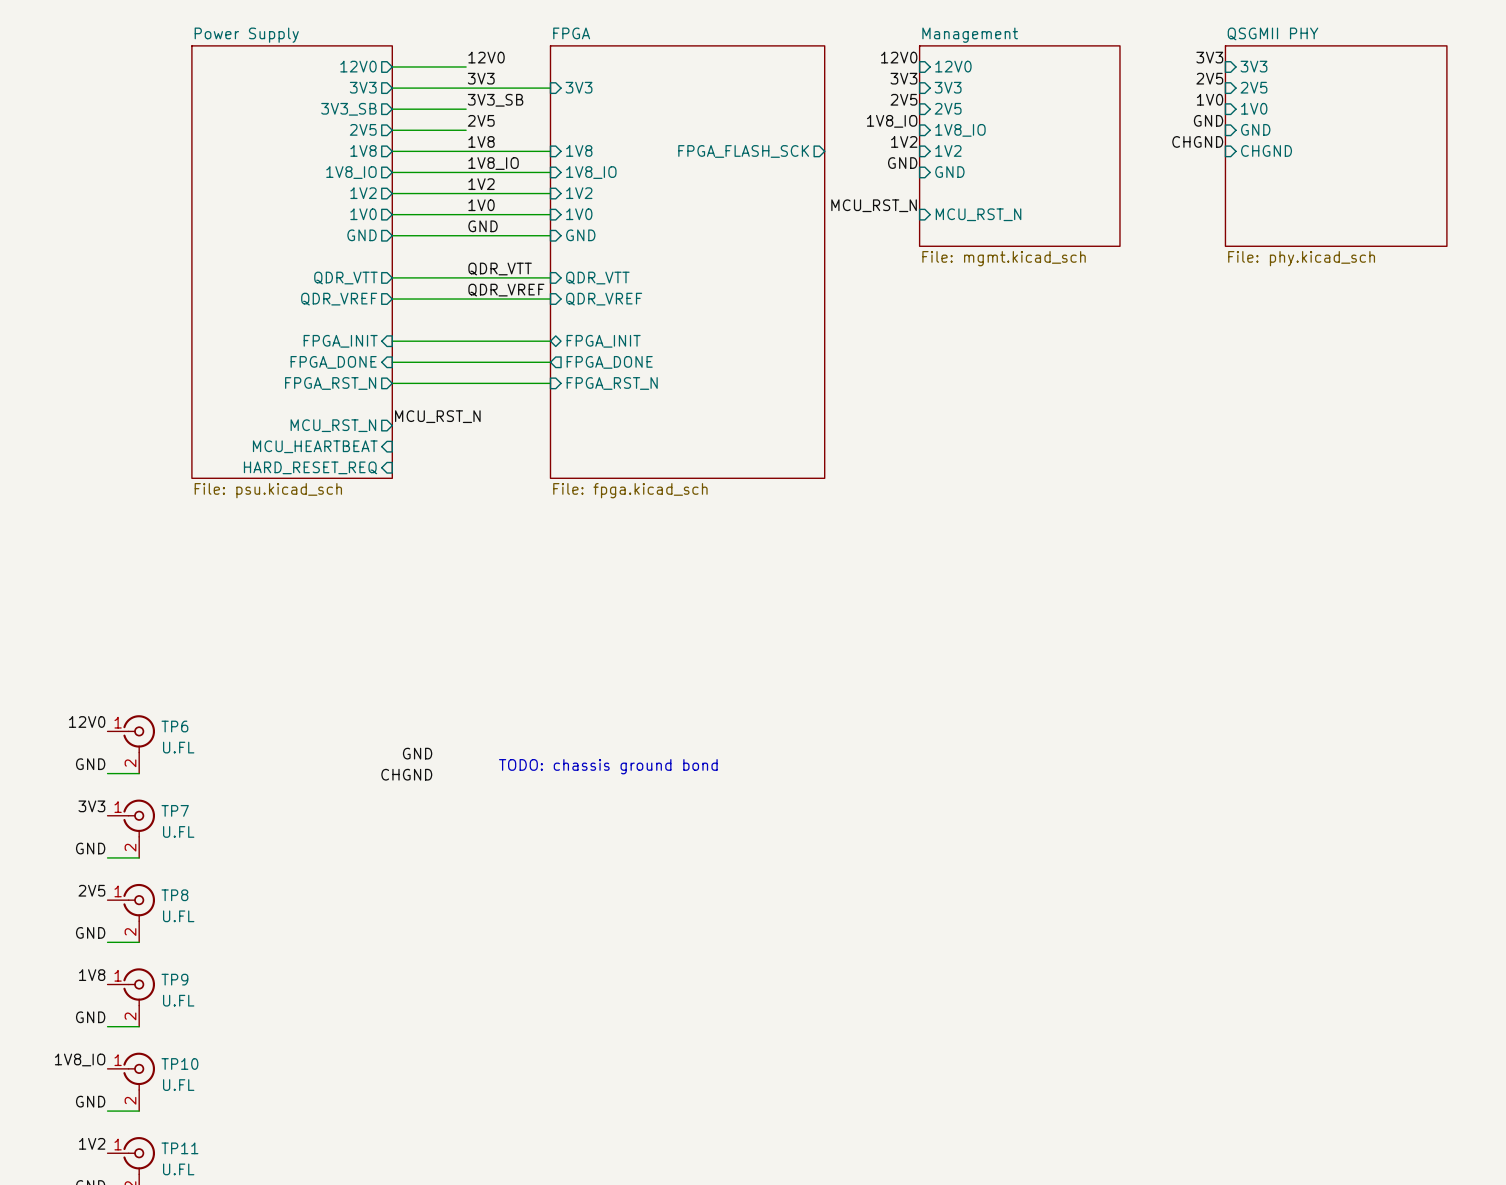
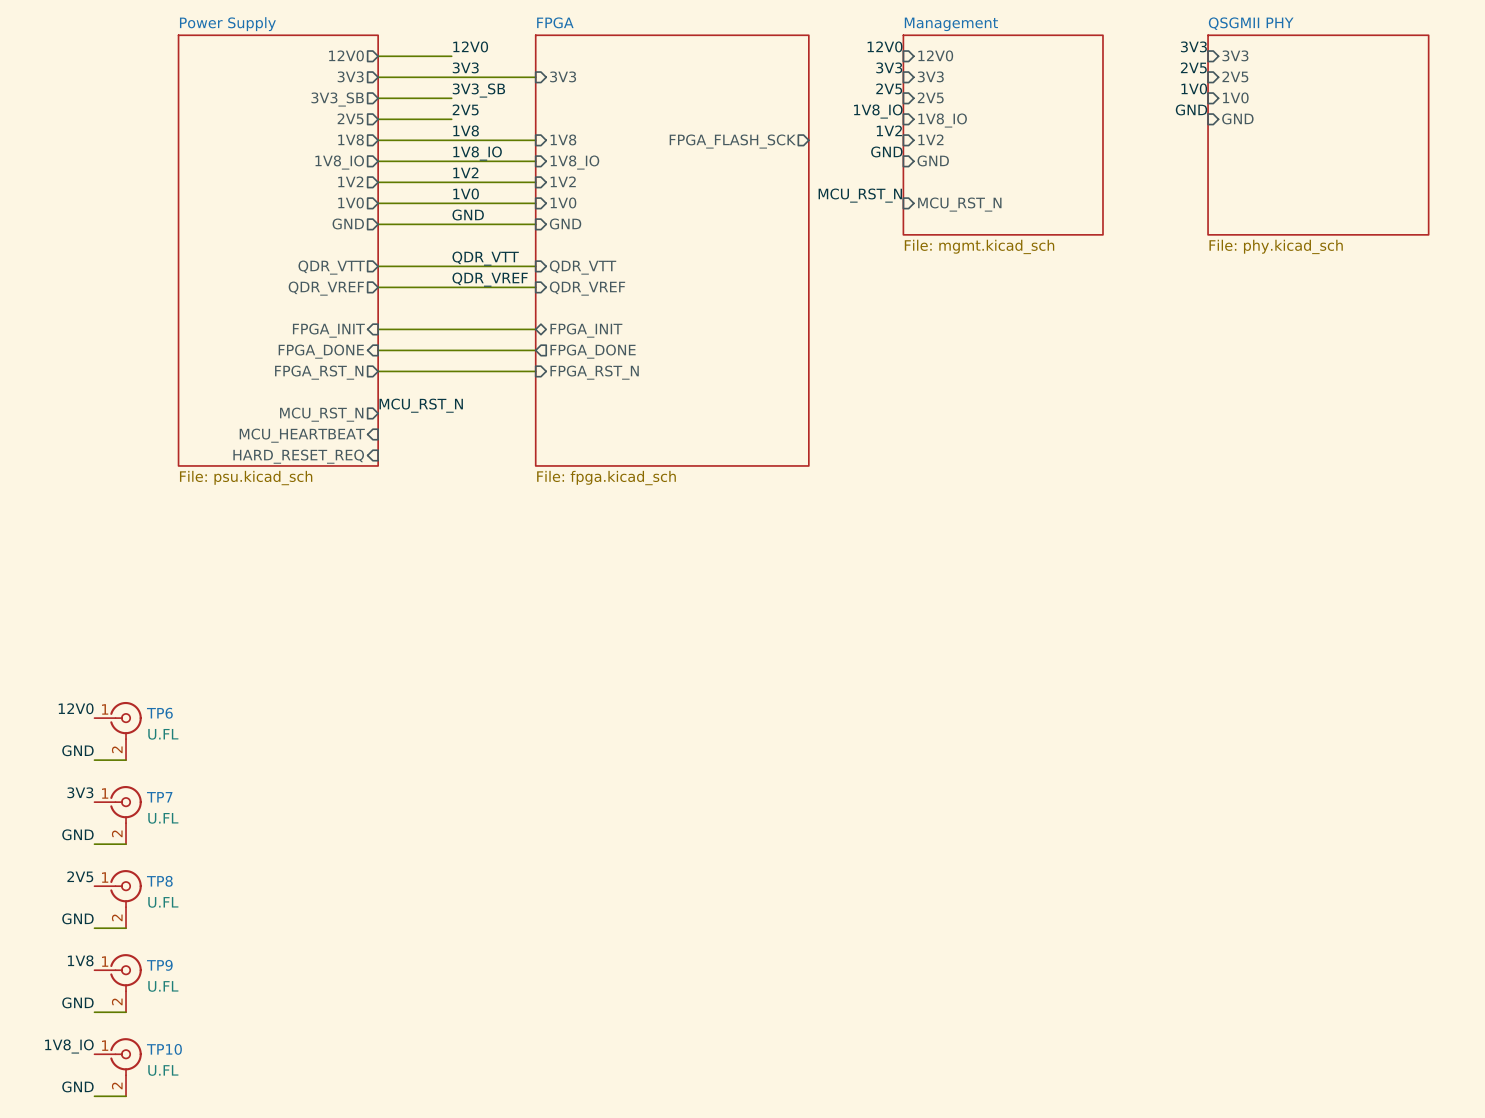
label: CHGND (1197, 141) -> none
sheet pin: CHGND (1266, 150) -> none
label: GND (417, 753) -> none
text: TODO: chassis ground bond (608, 766) -> none
label: CHGND (406, 774) -> none

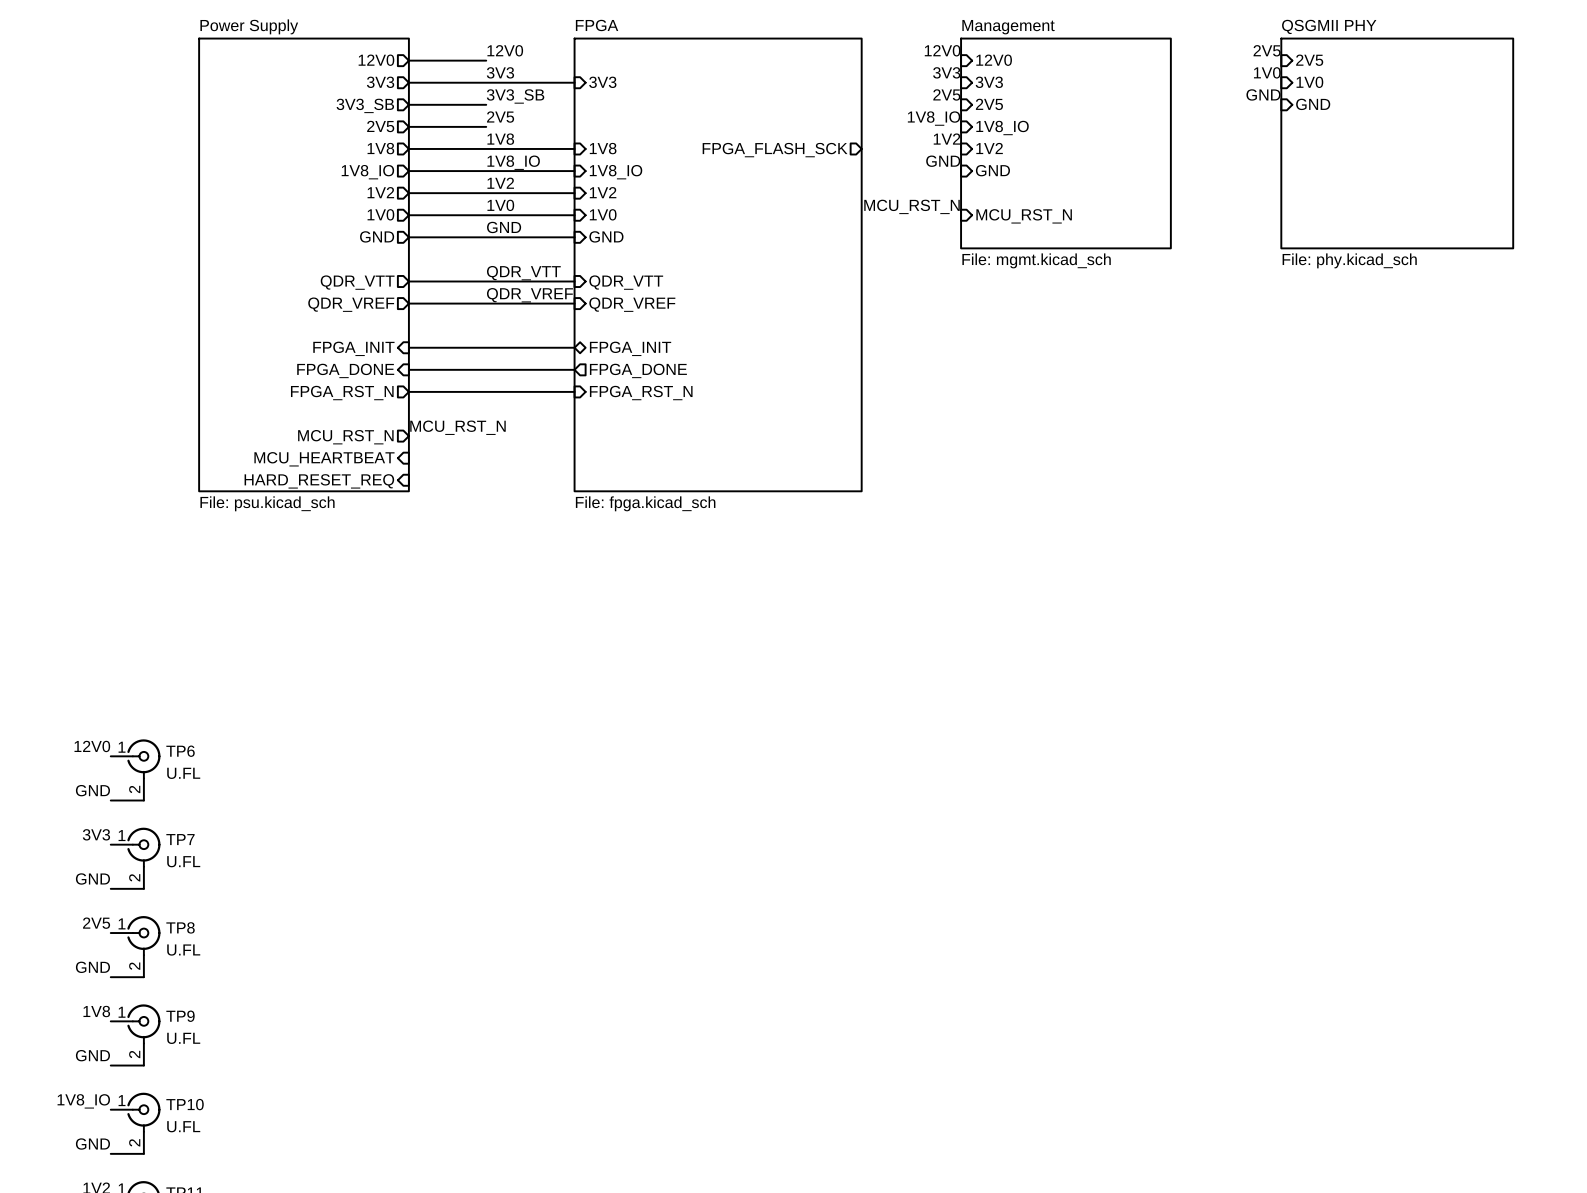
label: 3V3 (1193, 46) -> 2V5 (1267, 50)
sheet pin: 3V3 (1235, 55) -> 2V5 (1309, 60)
label: 2V5 (1193, 67) -> 1V0 (1267, 72)
sheet pin: 2V5 (1235, 76) -> 1V0 (1309, 82)
label: 1V0 (1194, 88) -> GND (1263, 94)
sheet pin: 1V0 (1235, 97) -> GND (1313, 104)
label: GND (1191, 109) -> none
sheet pin: GND (1237, 118) -> none

